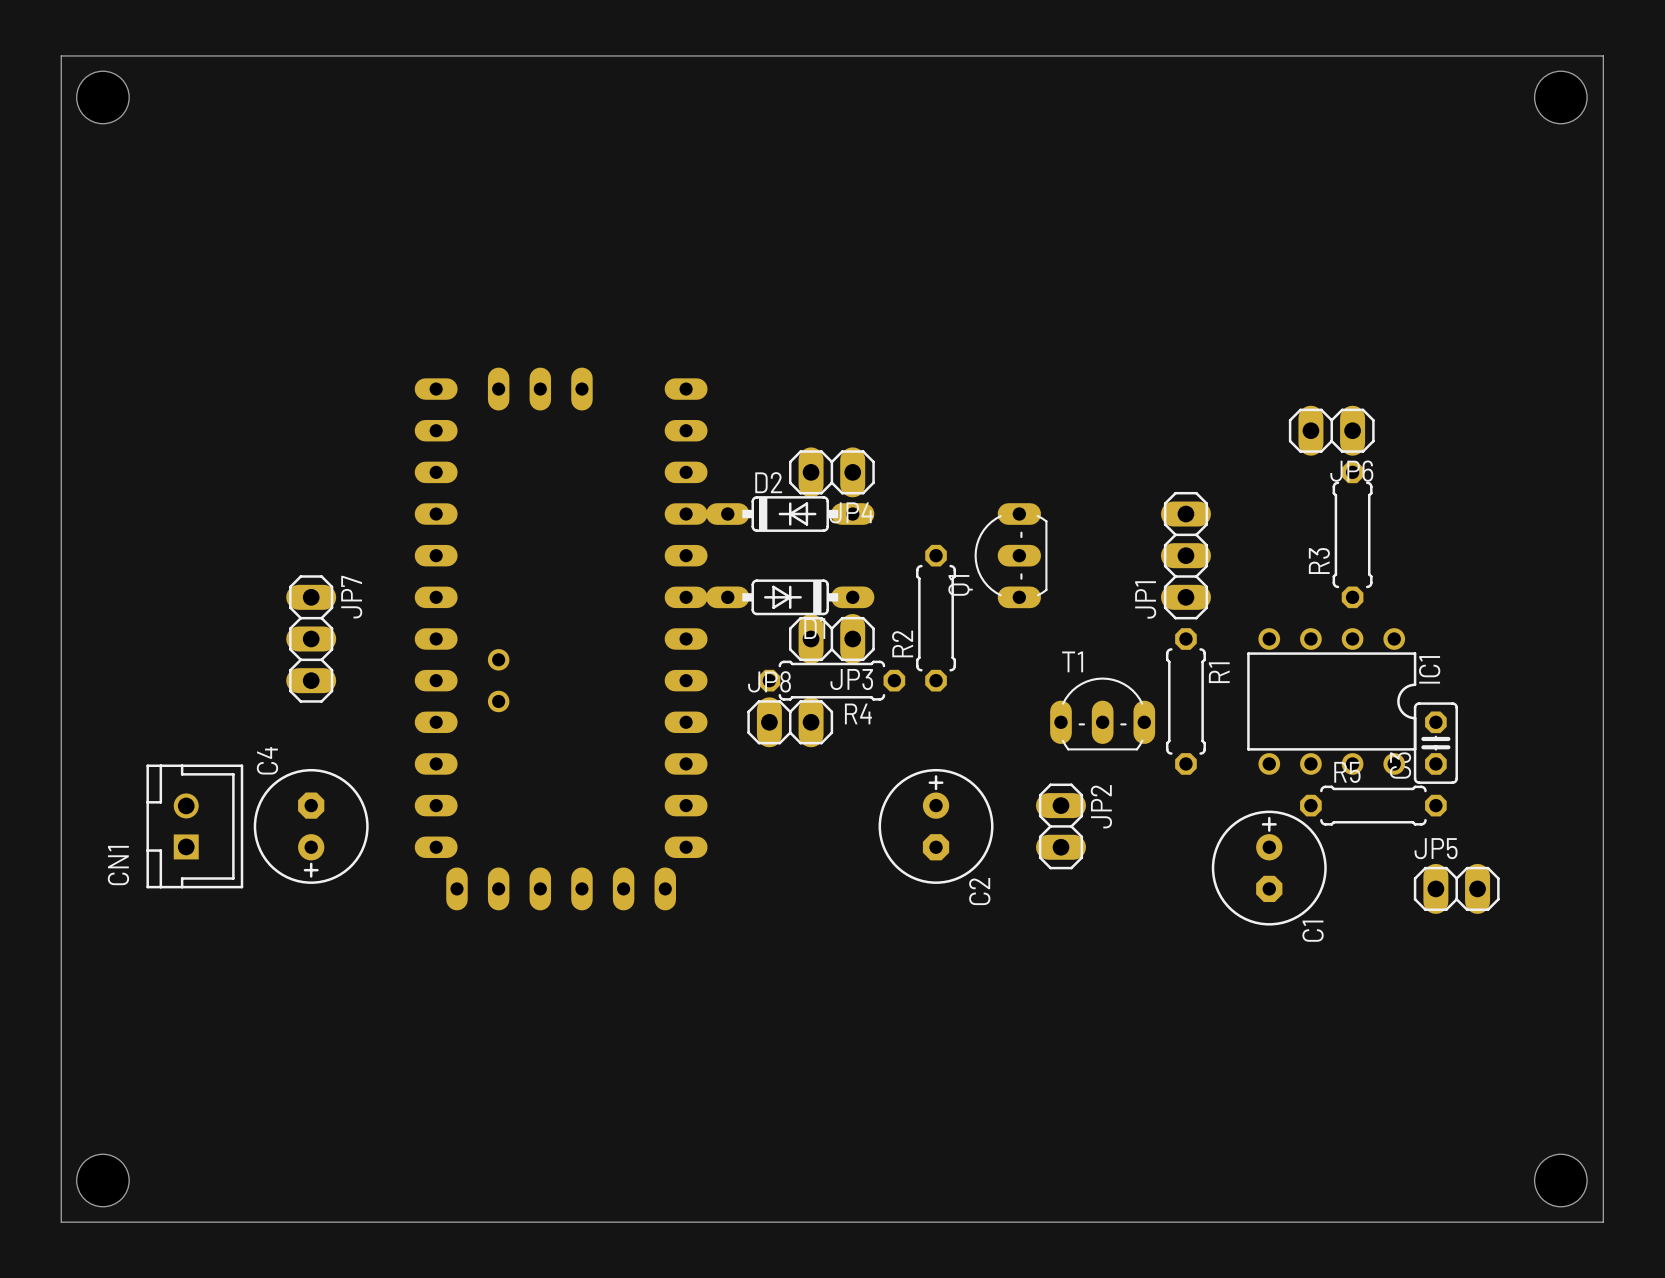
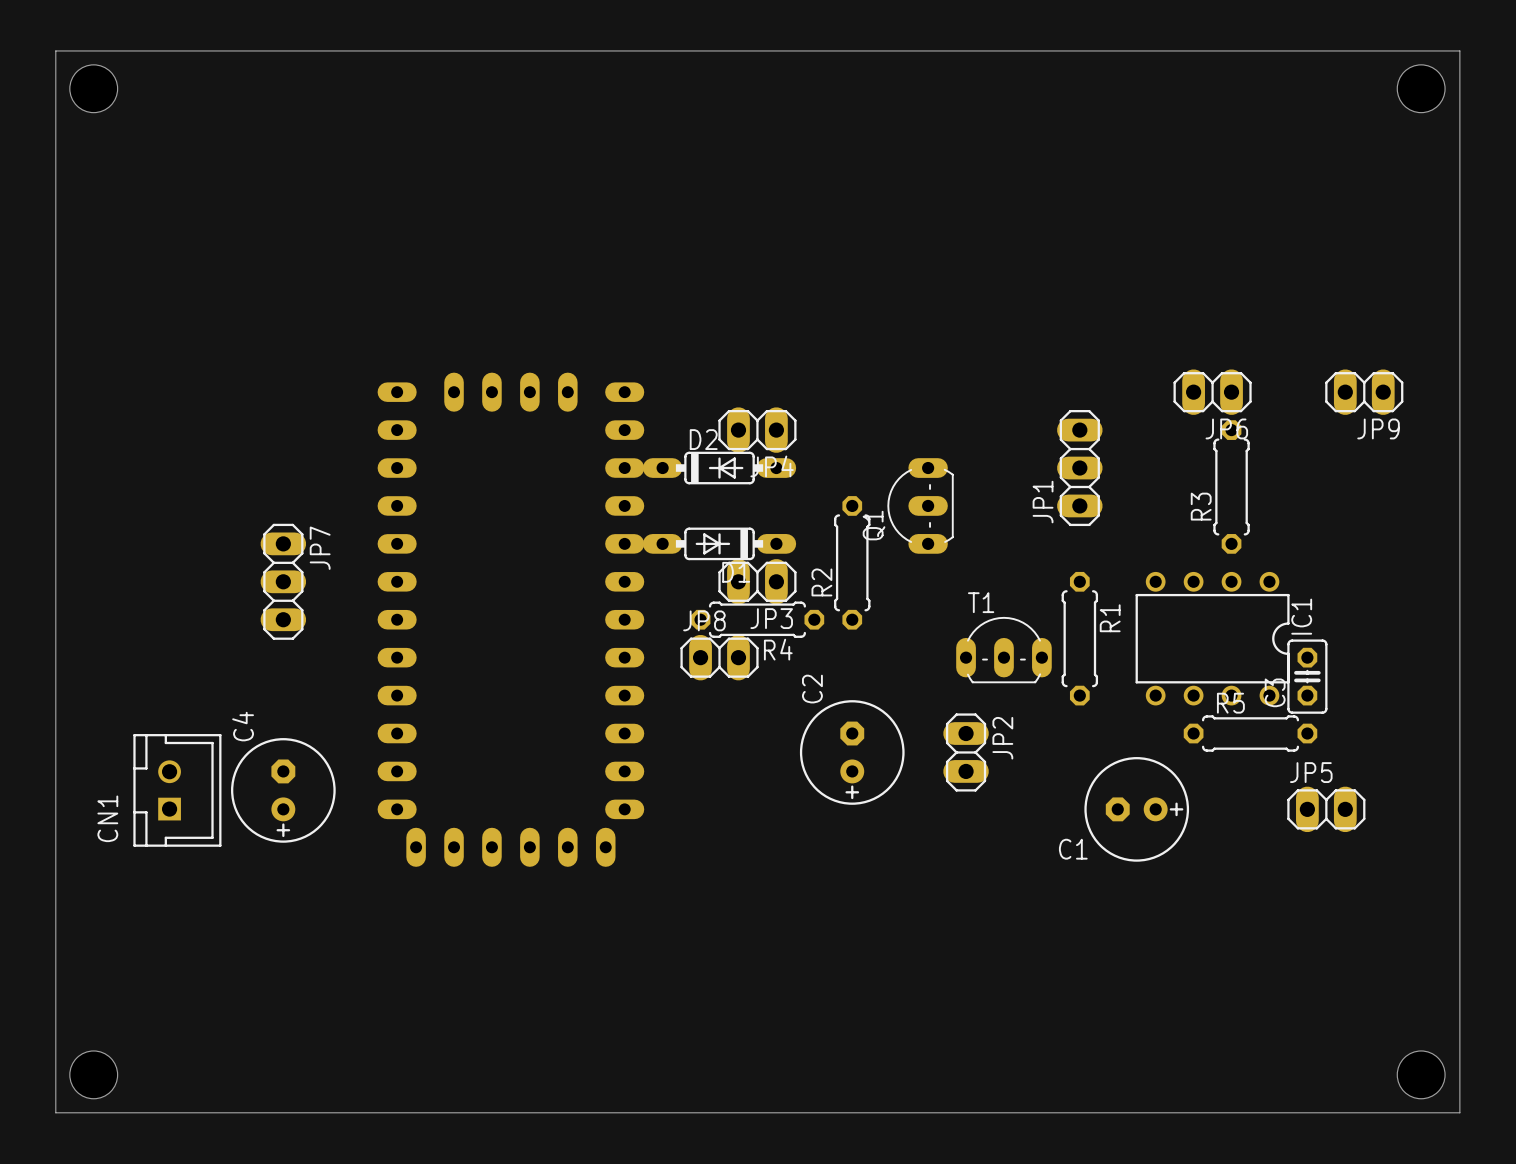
JP9: none -> (1364, 392)
JP1 position: (1185, 555) -> (1079, 468)
part: (561, 638) -> none
part: none -> (510, 619)
CN1 position: (194, 826) -> (177, 790)
C4 position: (311, 826) -> (283, 790)
C2 rotation: 0° (936, 826) -> 180° (852, 752)
C1 rotation: 0° (1269, 868) -> 90° clockwise (1136, 809)

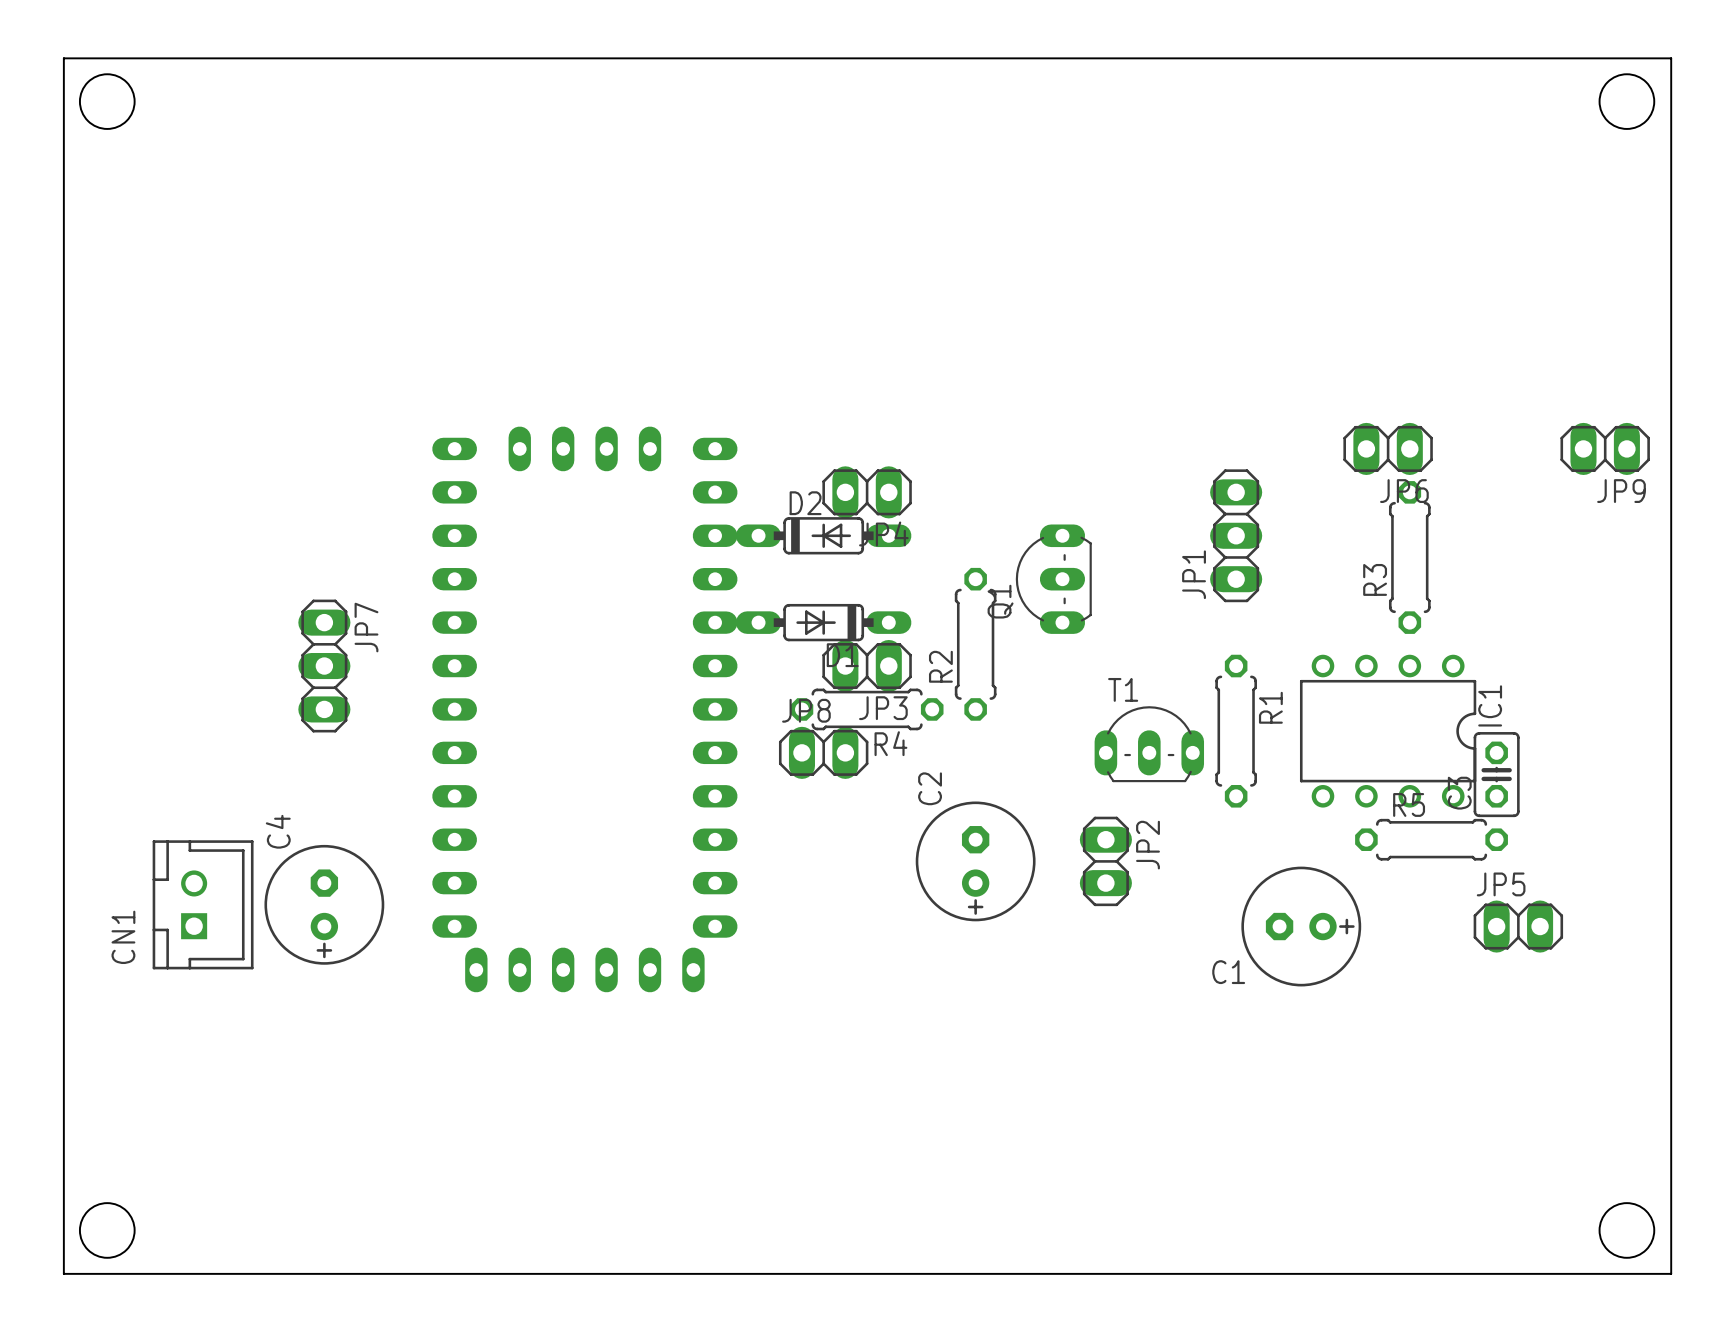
JP9 position: (1364, 392) -> (1605, 448)

